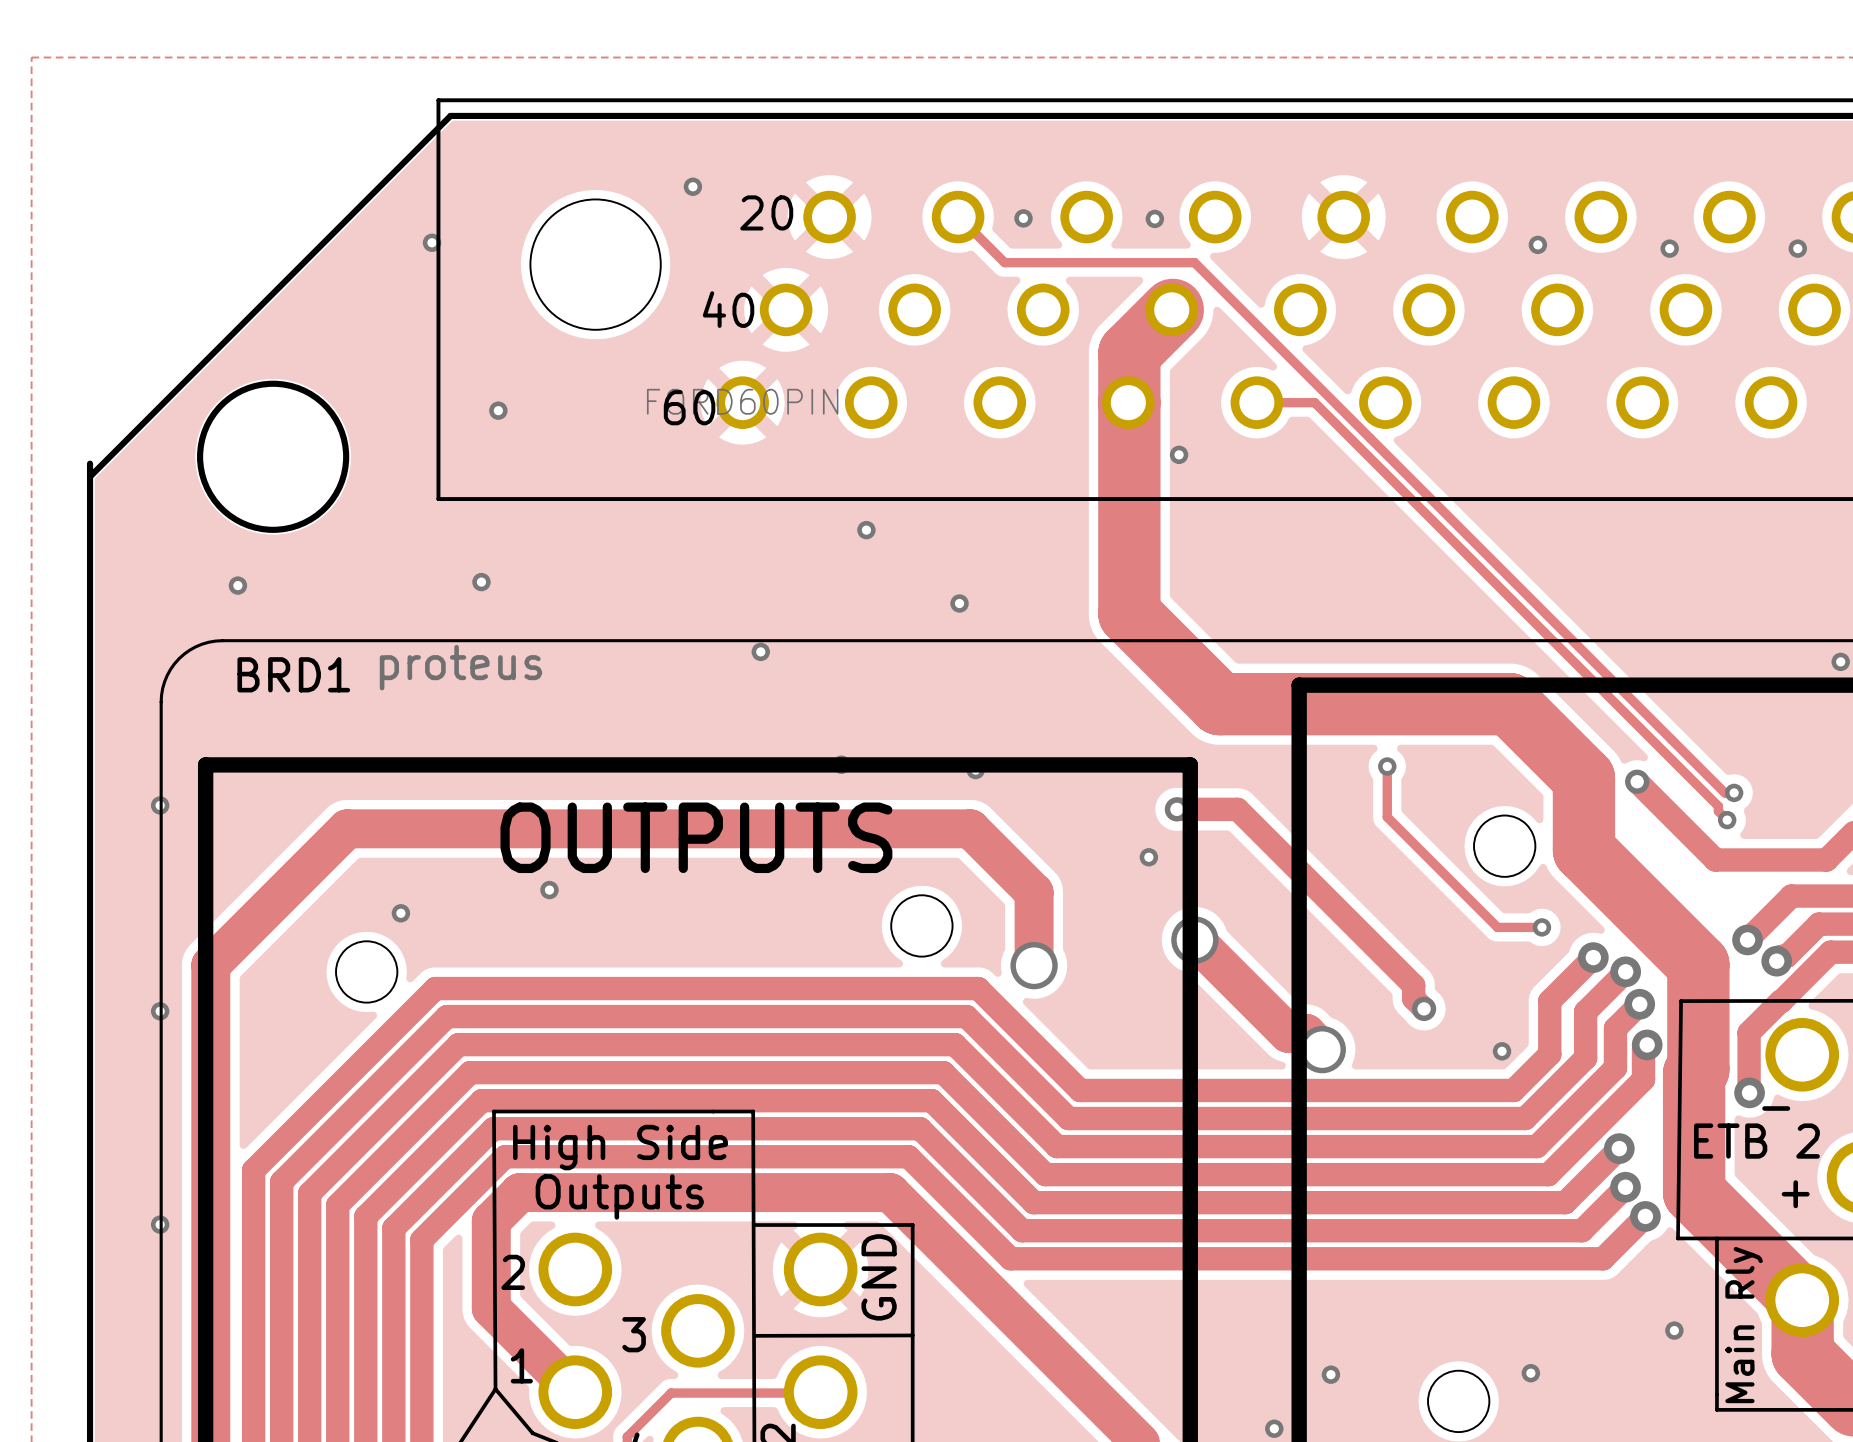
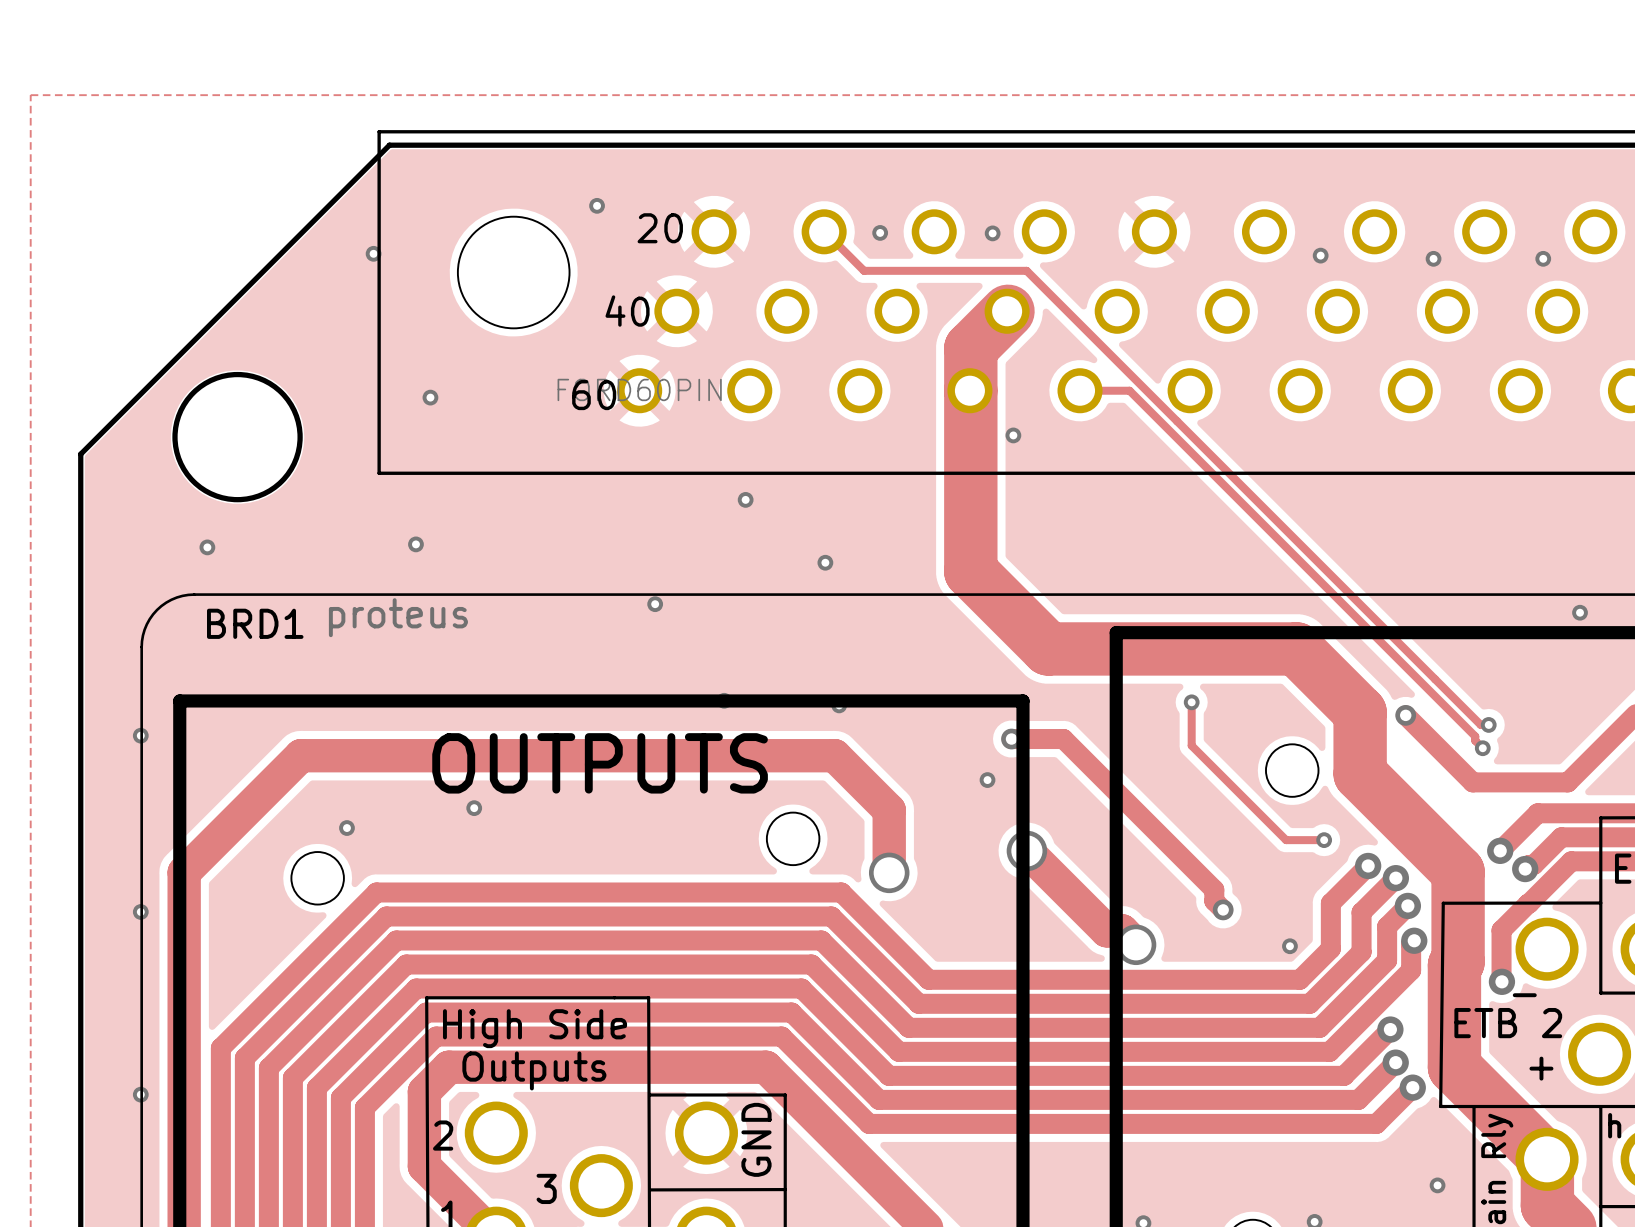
board edge: (90, 463) (90, 476) -> none

